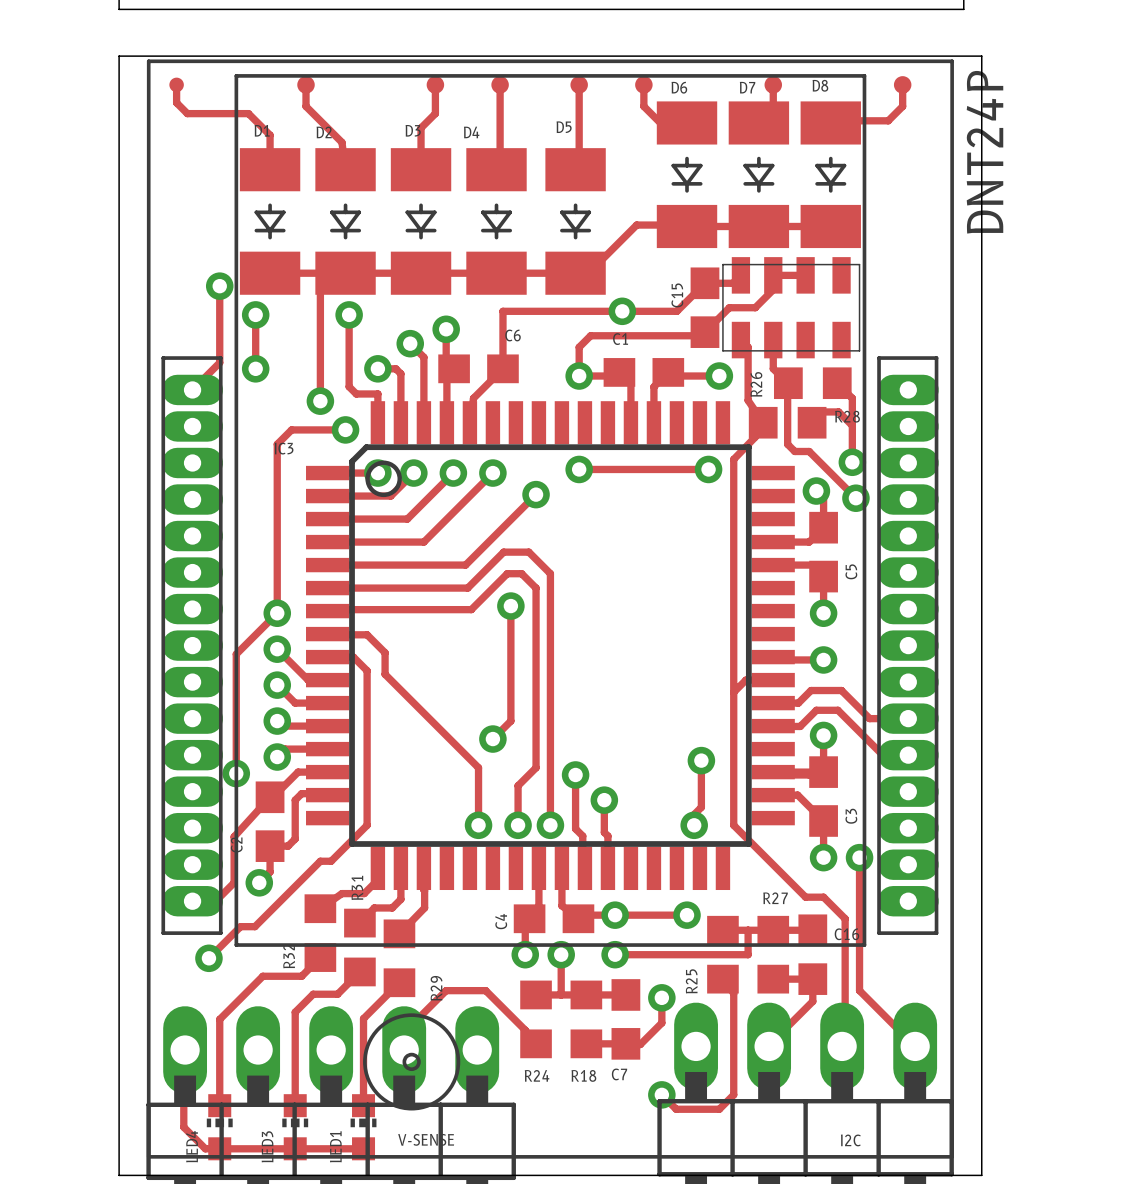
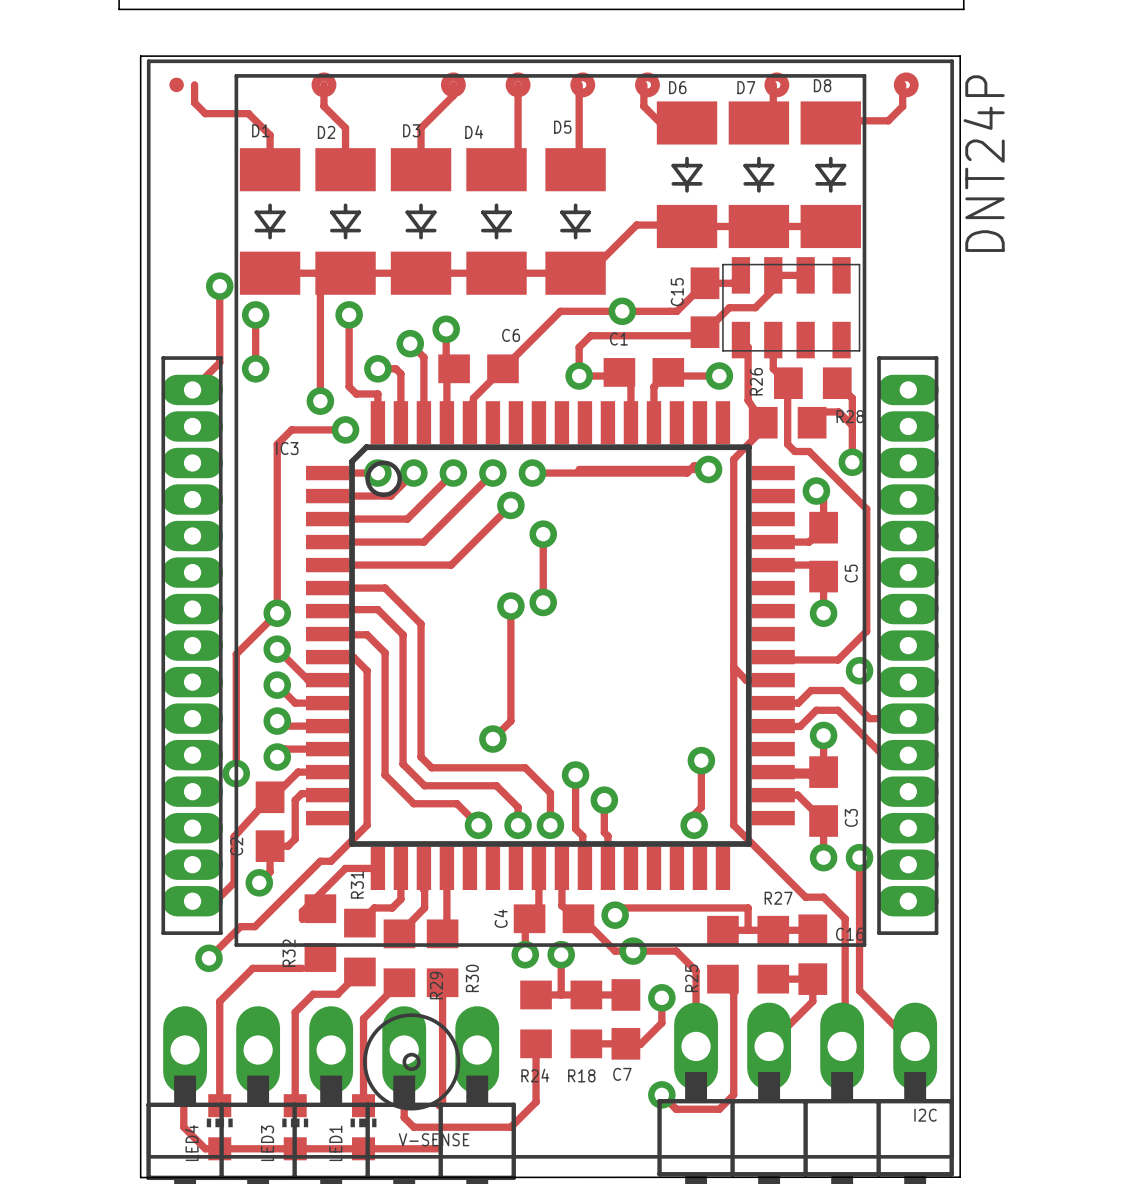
board edge: (140, 56) (119, 56) (119, 1175) (981, 1175) (981, 56) (960, 56) -> (140, 56) (140, 1177) (960, 1177) (960, 56)
drawing shape: [297, 76, 315, 94] -> [311, 72, 337, 98]
drawing shape: [426, 76, 445, 94] -> [440, 72, 466, 98]
drawing shape: [491, 76, 509, 94] -> [505, 72, 531, 98]
drawing shape: [570, 76, 588, 94] -> [570, 72, 596, 98]
drawing shape: [635, 76, 653, 94] -> [635, 72, 660, 98]
drawing shape: [764, 76, 783, 94] -> [764, 72, 790, 98]
drawing shape: [893, 76, 912, 94] -> [893, 72, 919, 98]
track: (176, 84) (176, 102) (187, 113) (205, 113) -> (194, 84) (194, 102) (205, 113)
track: (306, 84) (306, 106) (341, 142) (345, 169) -> (323, 84) (323, 106) (345, 128) (345, 169)
track: (435, 84) (435, 113) -> (453, 84) (453, 95) (435, 113)
track: (500, 84) (500, 156) (496, 169) -> (518, 84) (518, 153) (496, 169)
track: (560, 311) (502, 311) (502, 368) -> (560, 311) (503, 368)
track: none -> (708, 465) (694, 465) (687, 473) (532, 473)
via: (579, 469) -> none
via: none -> (532, 473)
track: (536, 494) (465, 565) (451, 565) -> (510, 505) (451, 565)
via: (536, 494) -> none
track: none -> (855, 498) (866, 509) (866, 631) (837, 659) (823, 659)
via: (855, 498) -> none
via: none -> (510, 505)
track: none -> (543, 534) (543, 602)
via: none -> (543, 534)
track: (385, 588) (467, 588) (503, 552) (528, 552) (550, 573) (550, 792) -> (385, 588) (421, 624) (421, 757) (431, 767) (525, 767) (550, 792)
via: none -> (543, 602)
track: (377, 609) (471, 609) (507, 573) (521, 573) (536, 588) (536, 767) (518, 785) (518, 807) -> (377, 609) (403, 634) (403, 764) (424, 785) (496, 785) (518, 807)
via position: (823, 659) -> (859, 670)
track: (385, 674) (478, 767) (478, 825) -> (385, 674) (385, 774) (413, 803) (456, 803) (478, 825)
track: (745, 680) (733, 692) -> (745, 680) (733, 667)
track: (377, 868) (377, 879) (364, 893) (341, 893) (320, 908) -> (377, 868) (345, 868) (302, 911) (302, 919)
track: none -> (446, 868) (446, 933) (442, 933)
track: (579, 915) (687, 915) -> (579, 915) (615, 951) (676, 951) (696, 970) (696, 1046)
via: (687, 915) -> none
track: (748, 930) (748, 954) (615, 954) -> (748, 930) (748, 907) (622, 907) (618, 911)
via position: (615, 954) -> (633, 951)
track: (320, 957) (301, 976) (262, 976) (219, 1019) -> (302, 968) (252, 968) (219, 1001) (219, 1019)
R30: none -> (442, 958)
track: none -> (439, 982) (442, 982) (442, 1102) (439, 1105)
track: (536, 1043) (525, 1030) (485, 990) (446, 990) (404, 1032) (404, 1050) -> (536, 1043) (536, 1102) (510, 1127) (413, 1127) (404, 1117) (404, 1050)
I2C name position: I2C (850, 1140) -> I2C (925, 1115)
track: none -> (363, 1148) (439, 1148)

